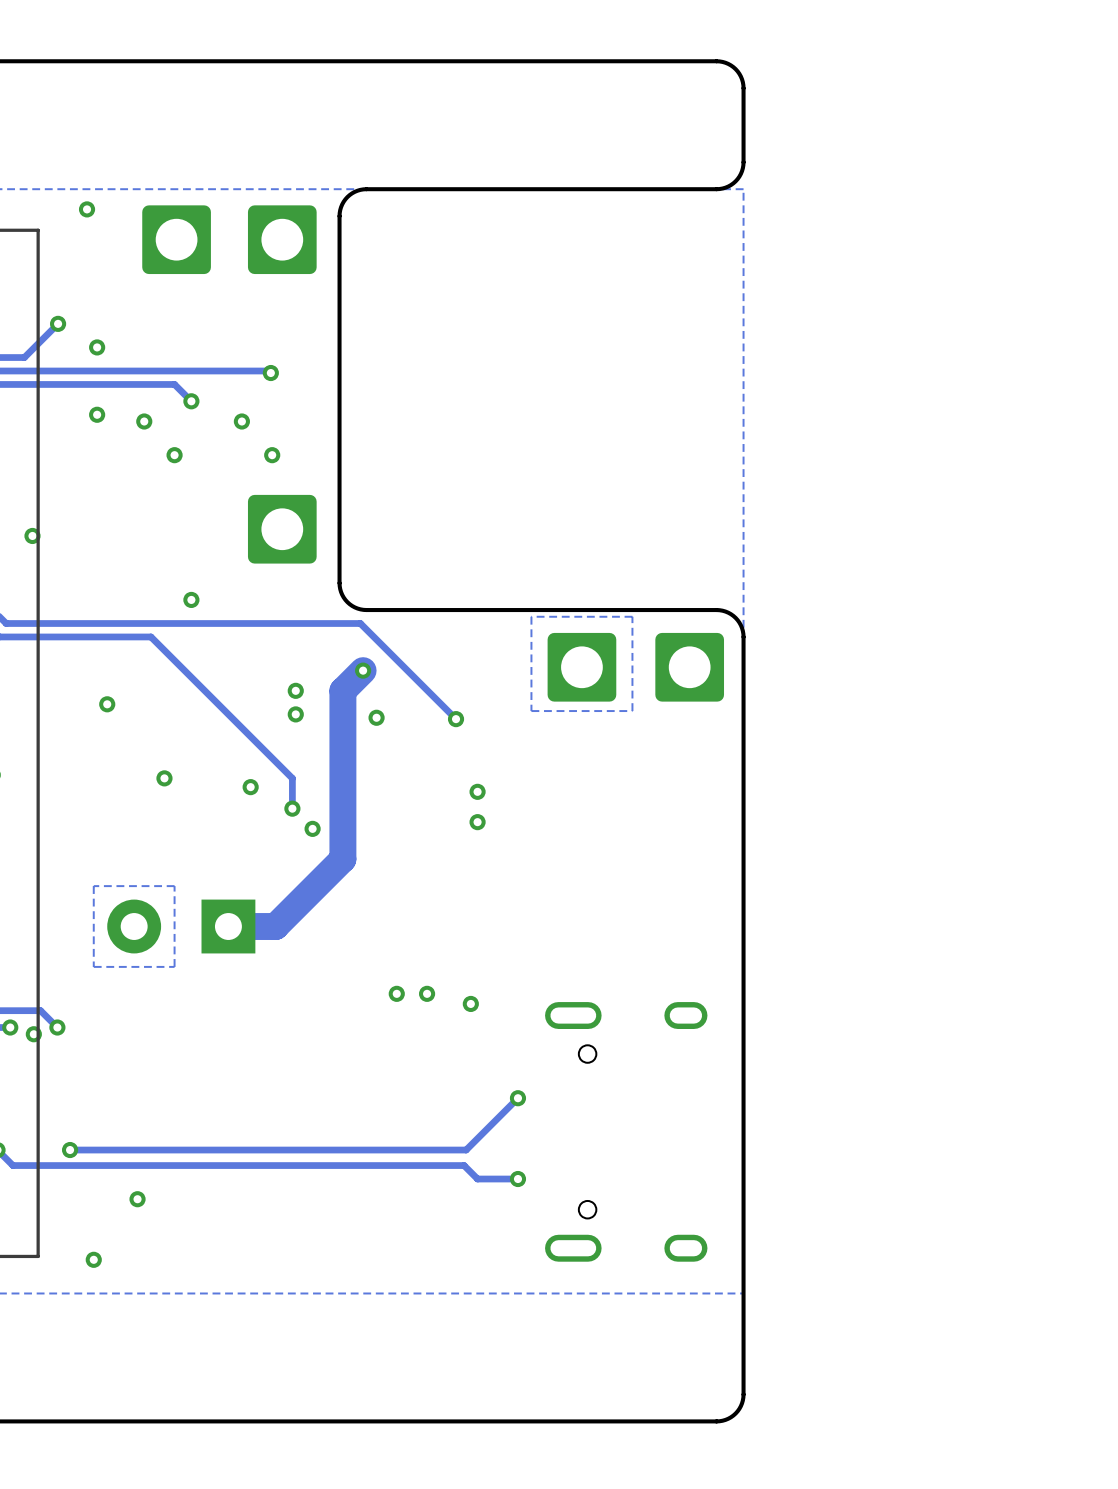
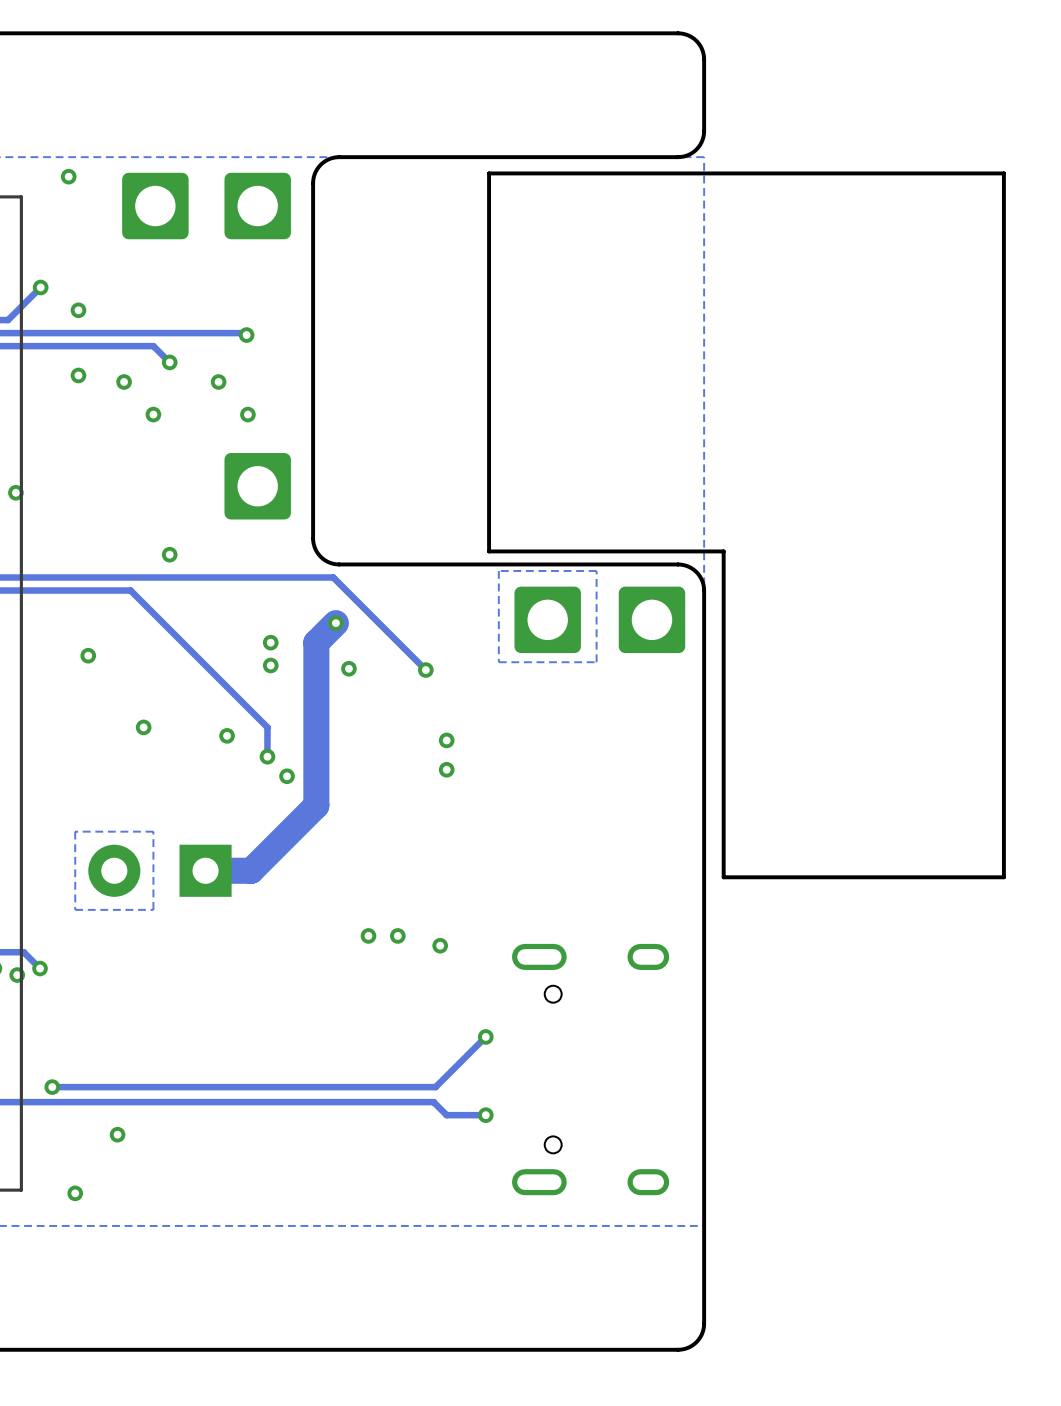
board edge: none -> (1003, 173) (1003, 877) (723, 877) (723, 551) (489, 551) (489, 173) (1003, 173)

